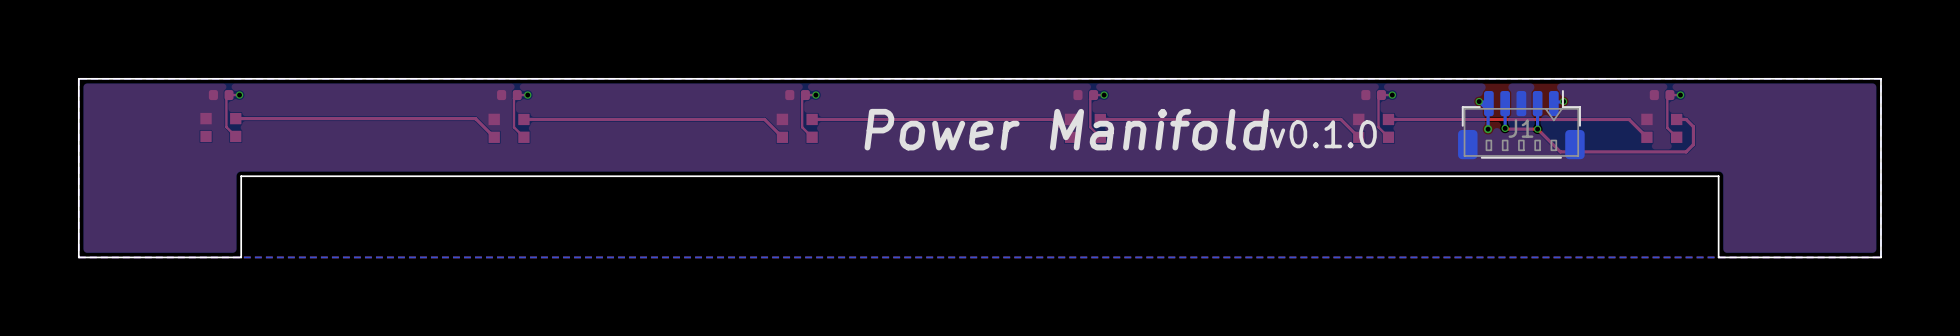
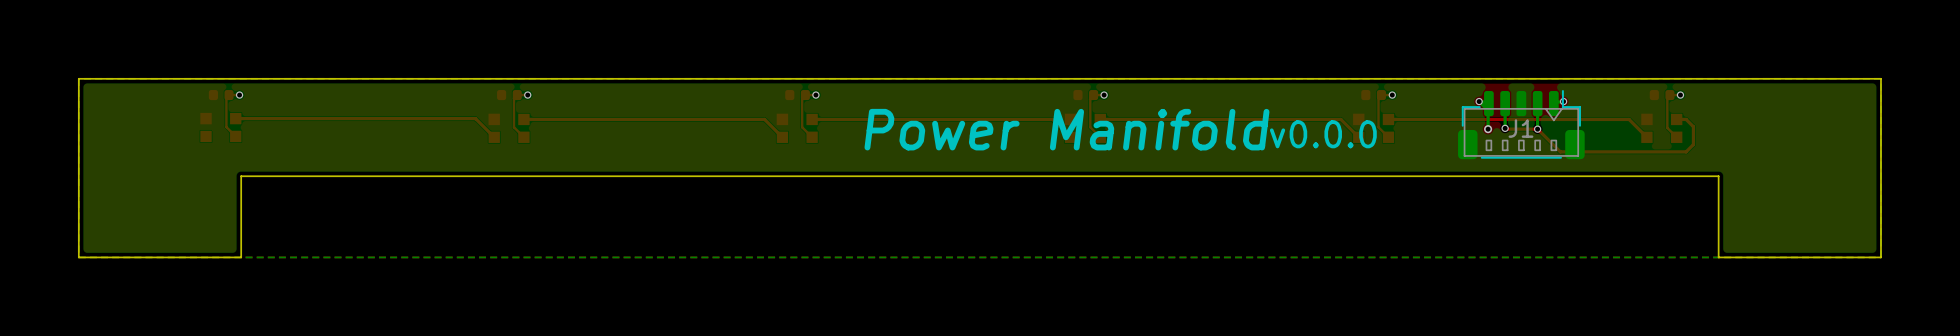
text: v0.1.0 (1323, 134) -> v0.0.0 (1323, 134)

